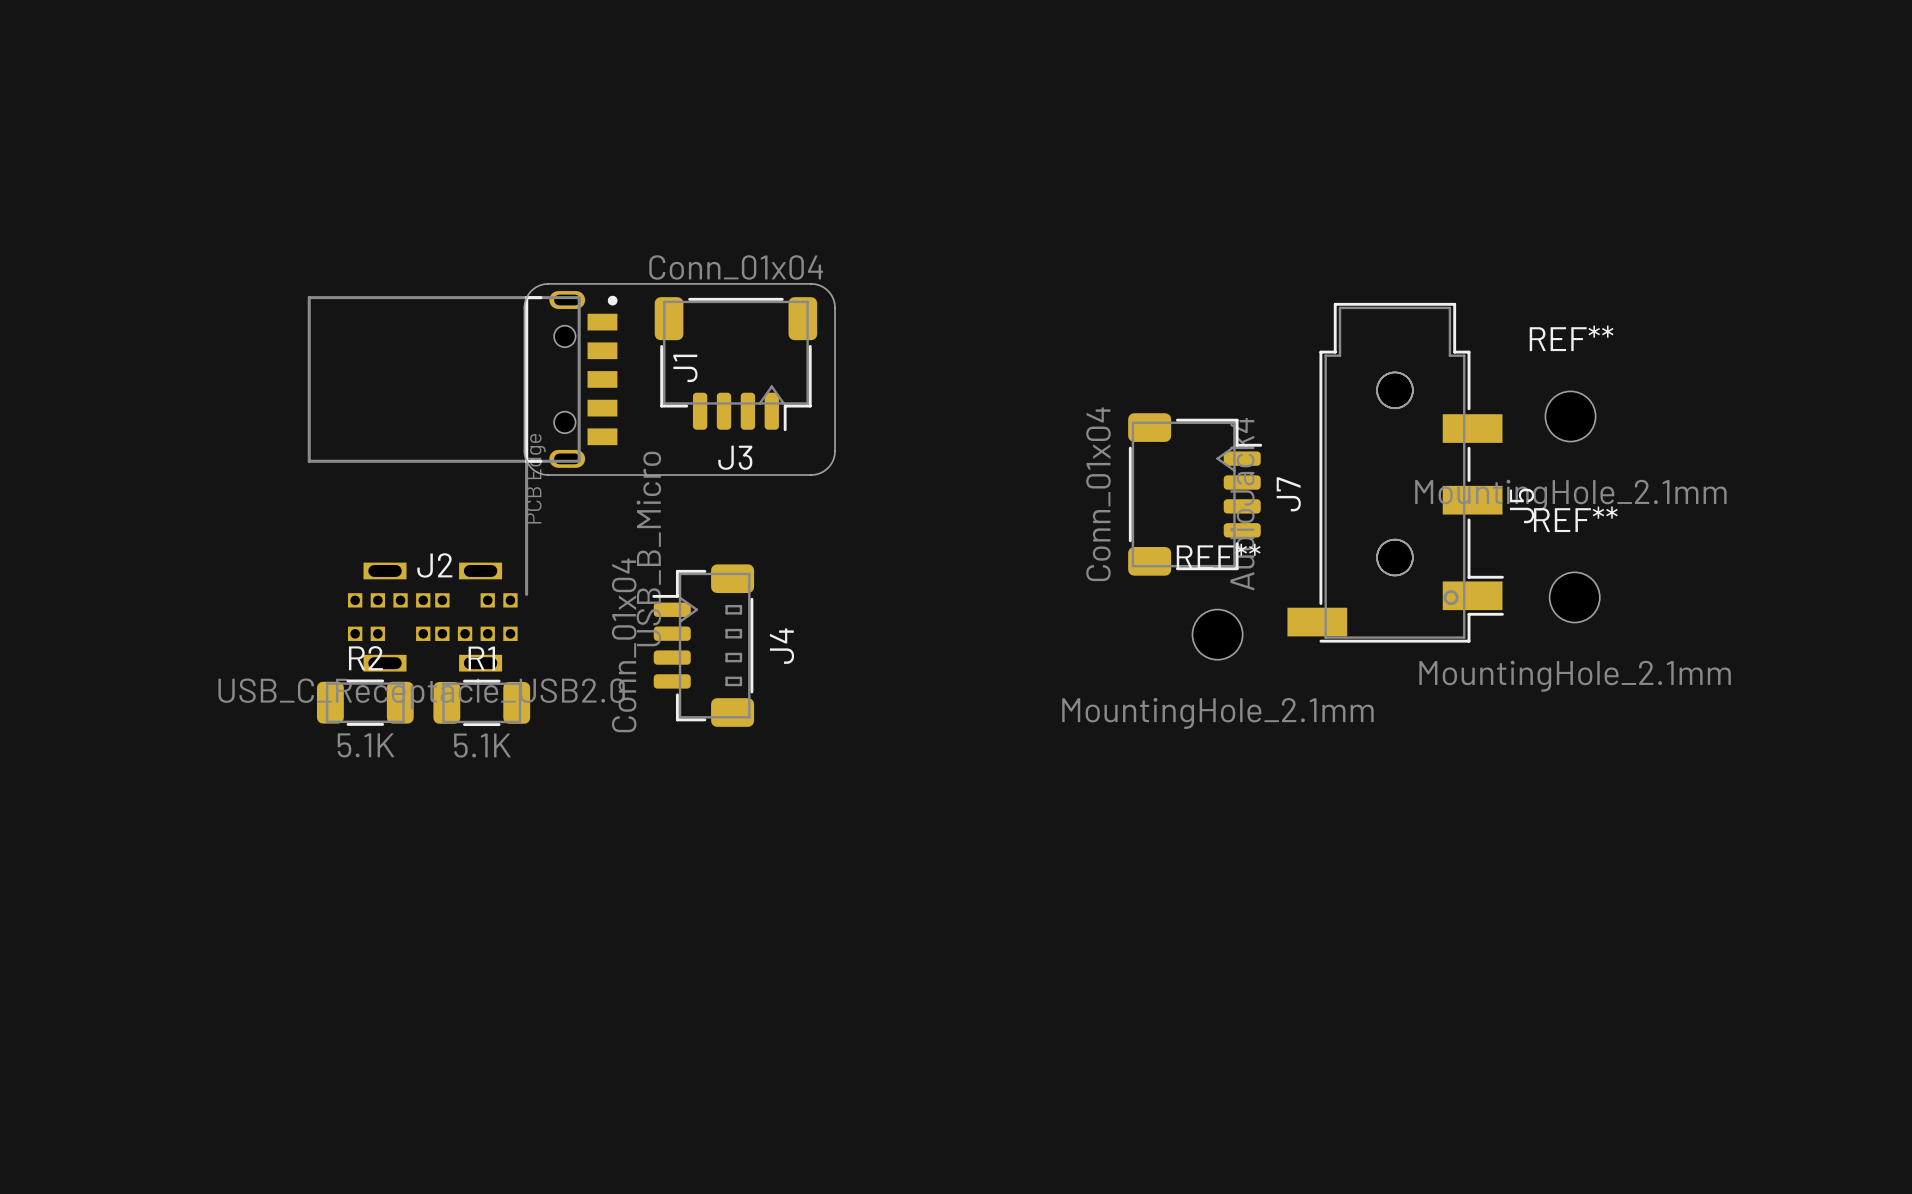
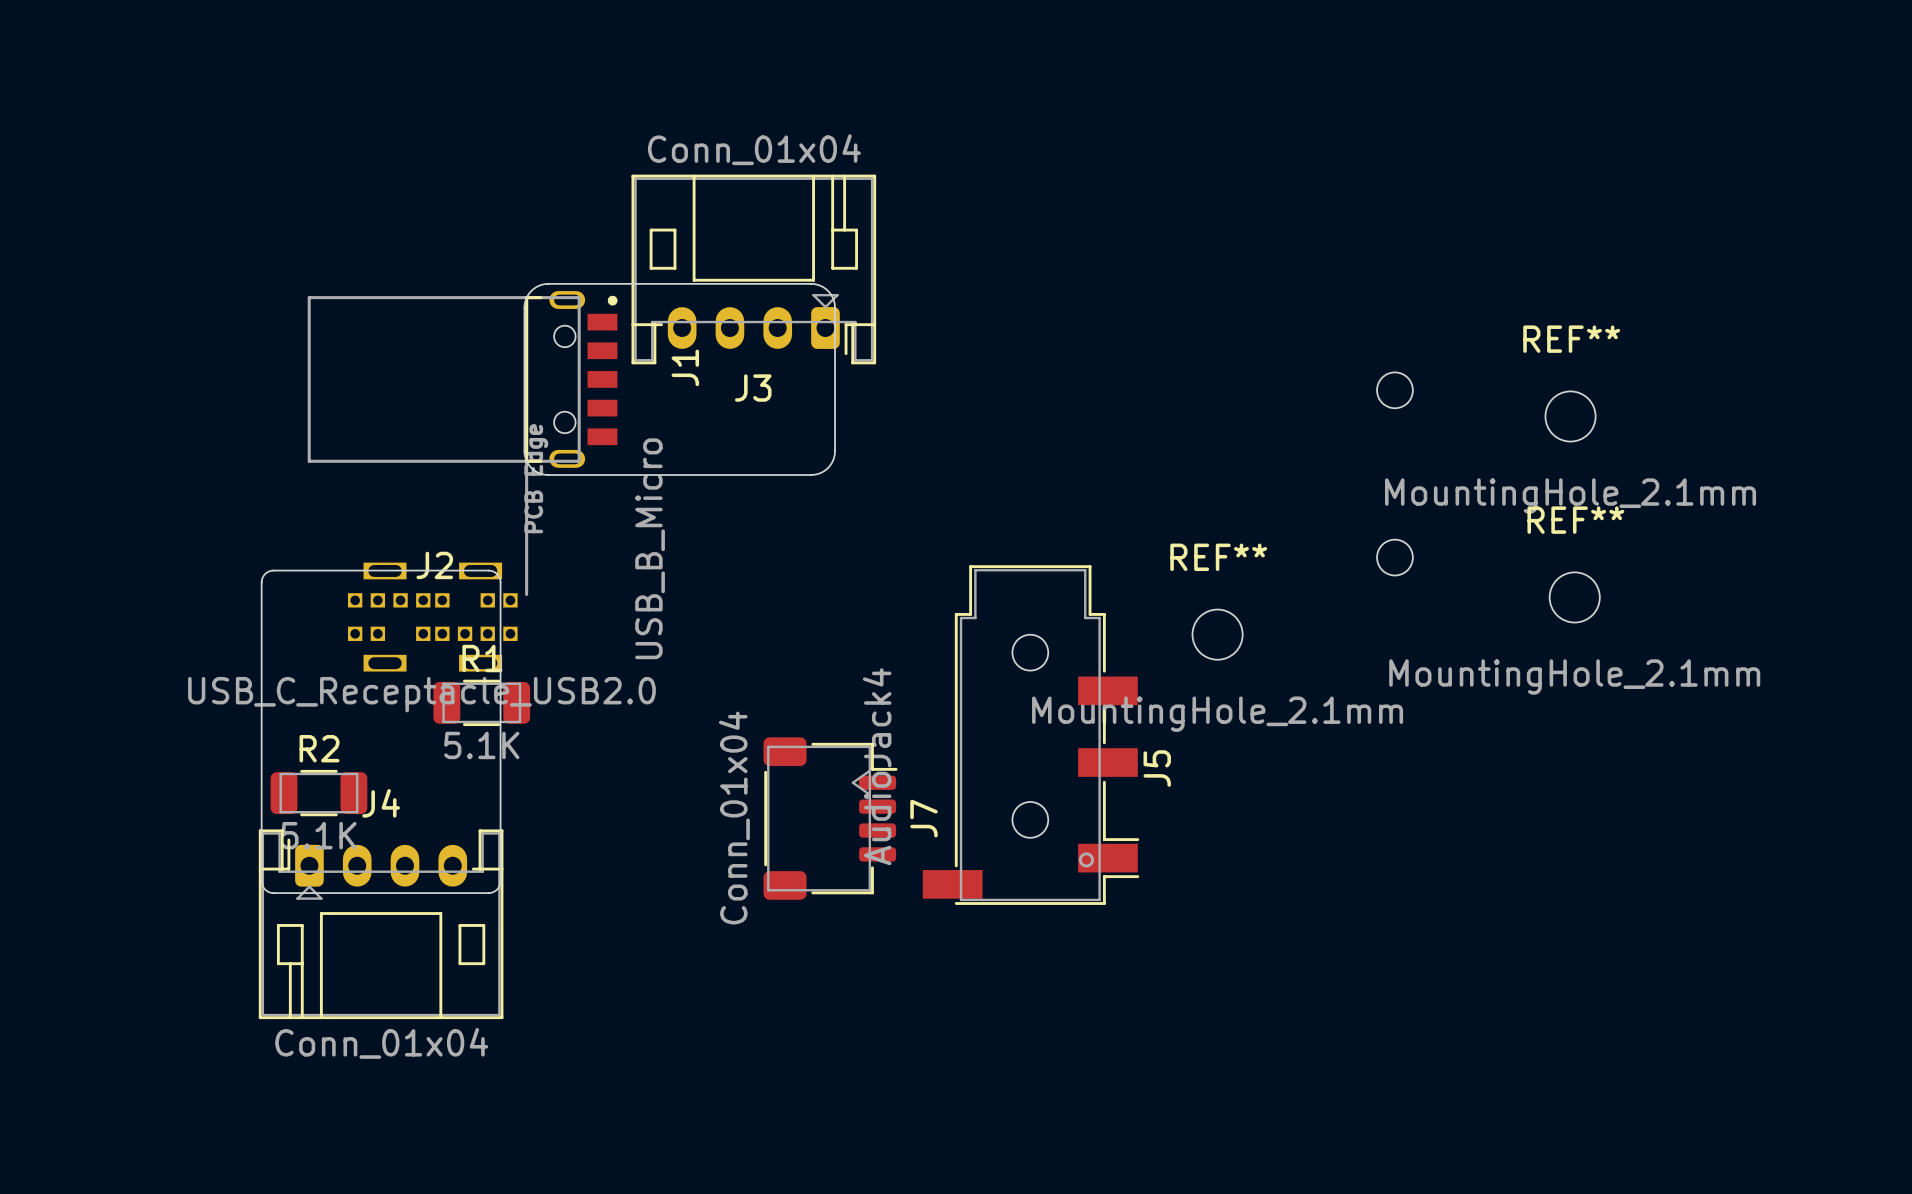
J3 footprint: [654, 297, 818, 432] -> [631, 174, 877, 365]
J5 position: (1395, 472) -> (1031, 735)
J7 position: (1195, 494) -> (830, 818)
J4 footprint: [652, 564, 755, 727] -> [258, 829, 504, 1020]
board edge: none -> (273, 570) (488, 570) (498, 576) (500, 582) (500, 881) (495, 890) (488, 893) (273, 893) (263, 887) (261, 881) (261, 582) (265, 574) (273, 570)
J4 value position: Conn_01x04 (624, 645) -> Conn_01x04 (381, 1043)
J4 name position: J4 (781, 646) -> J4 (381, 803)
R2 position: (365, 702) -> (318, 793)

